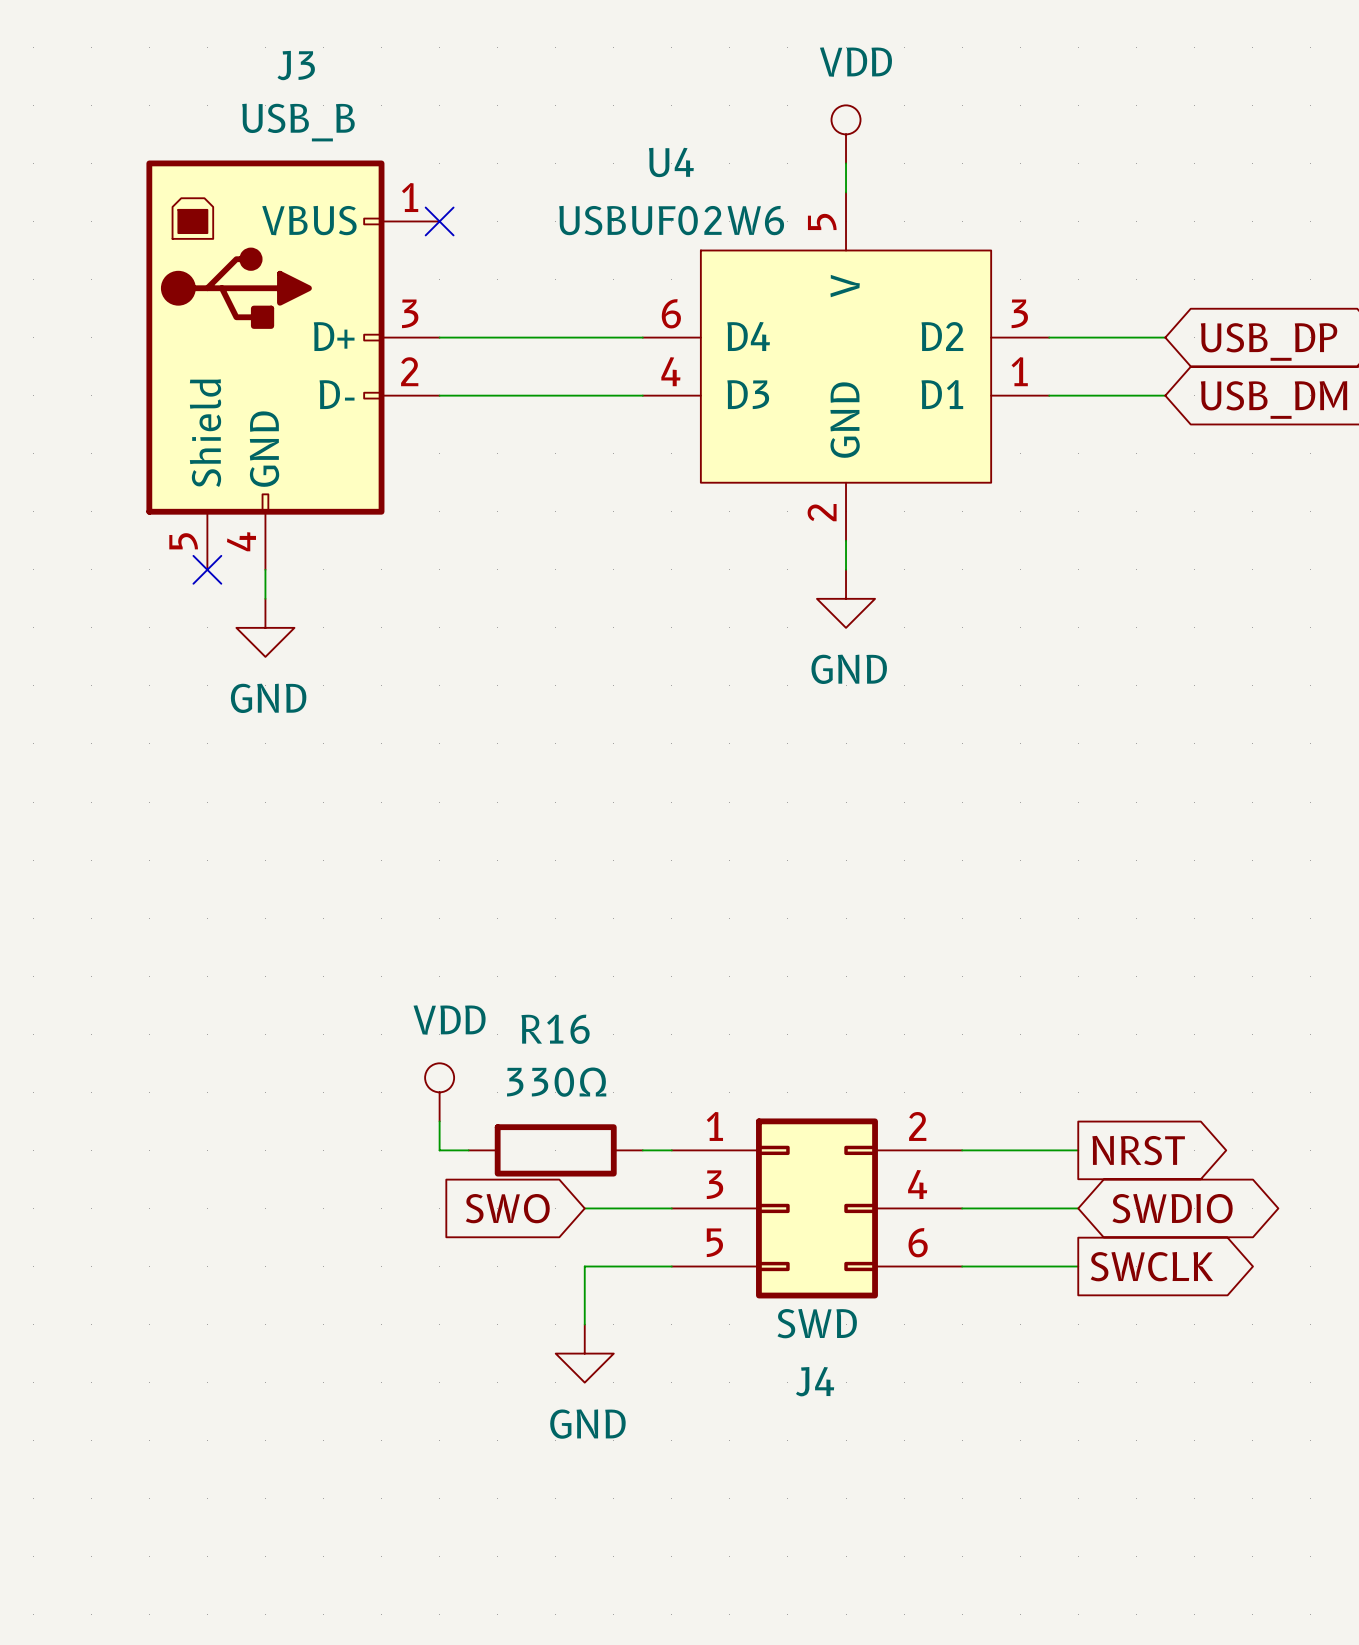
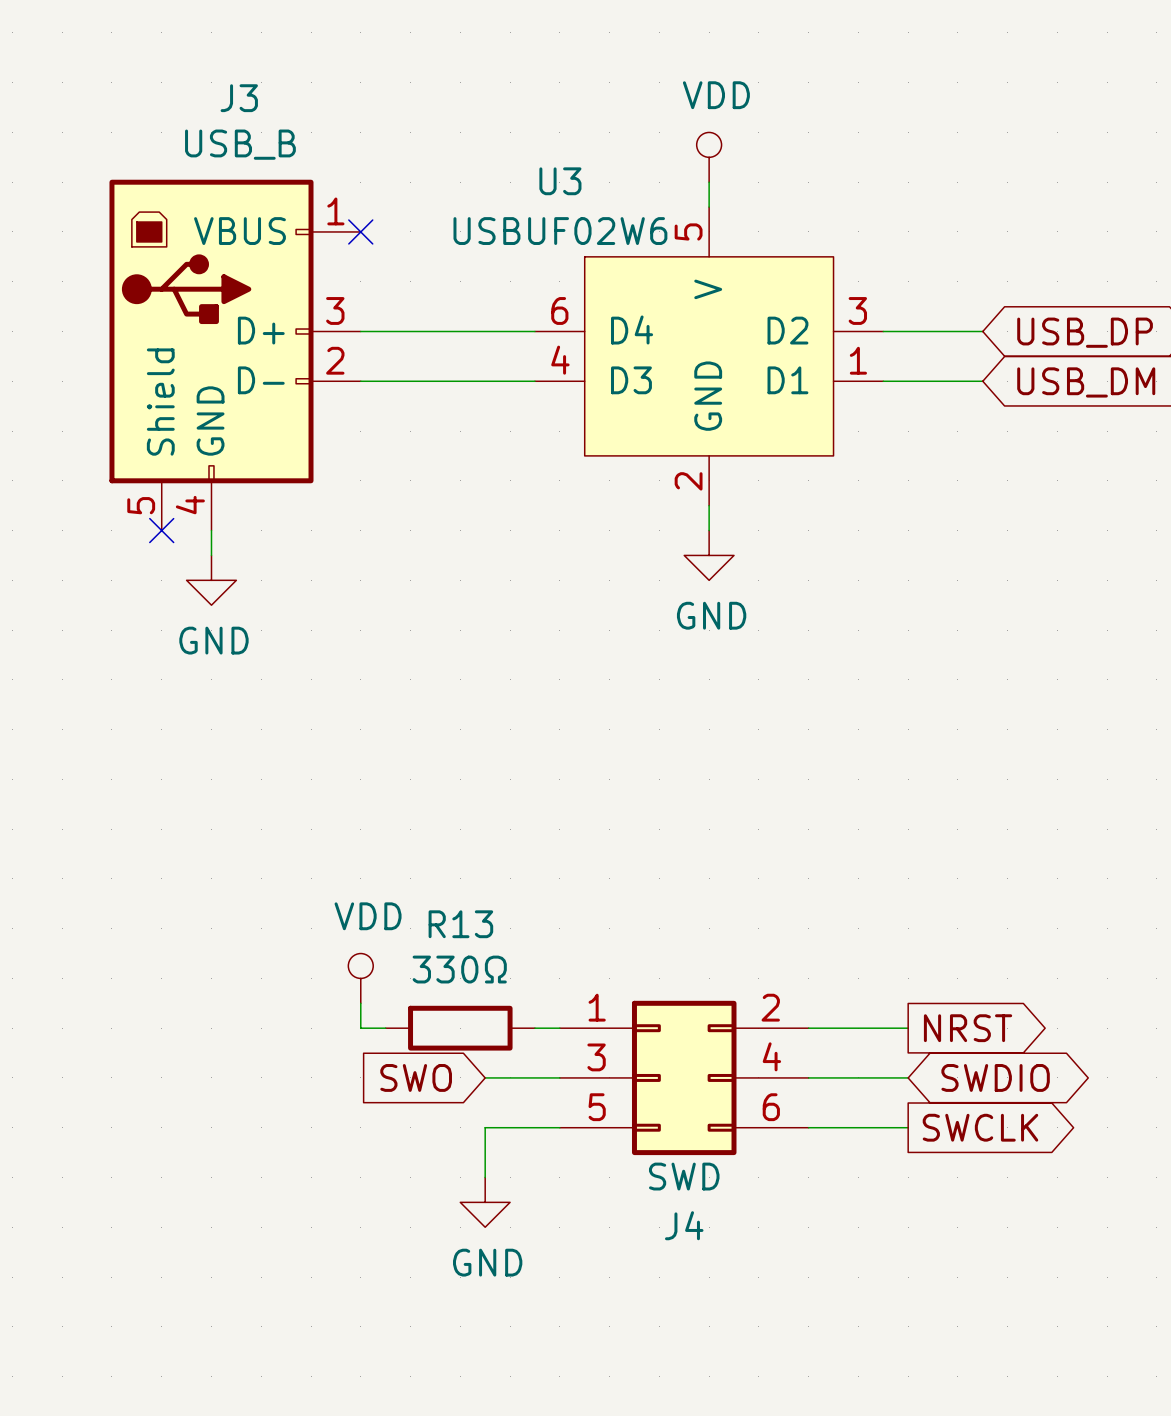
U4 name: U4 (671, 162) -> U3 (560, 181)
R16 name: R16 (555, 1029) -> R13 (460, 924)

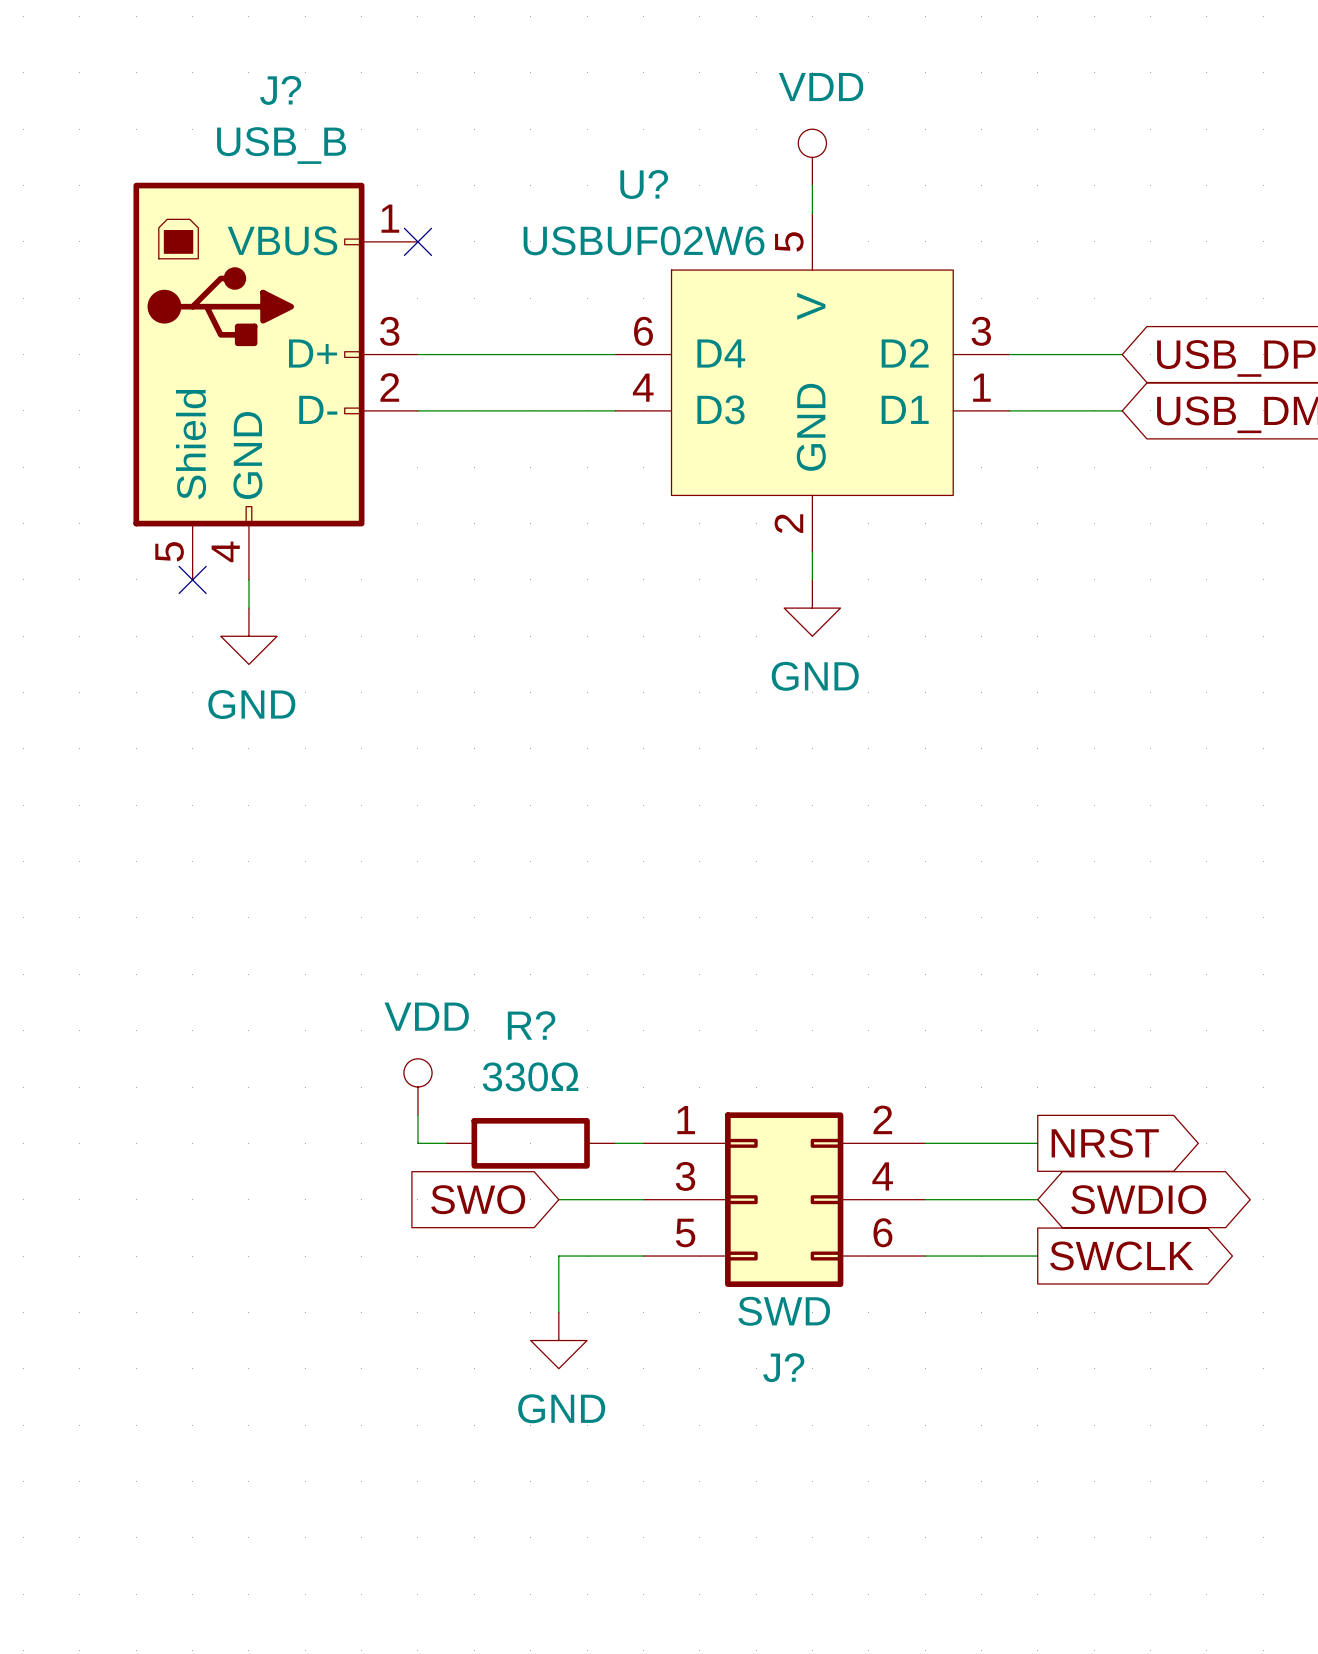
J3 name: J3 (239, 98) -> J? (280, 90)
U3 name: U3 (560, 181) -> U? (644, 184)
R13 name: R13 (460, 924) -> R? (531, 1025)
J4 name: J4 (684, 1225) -> J? (783, 1367)

